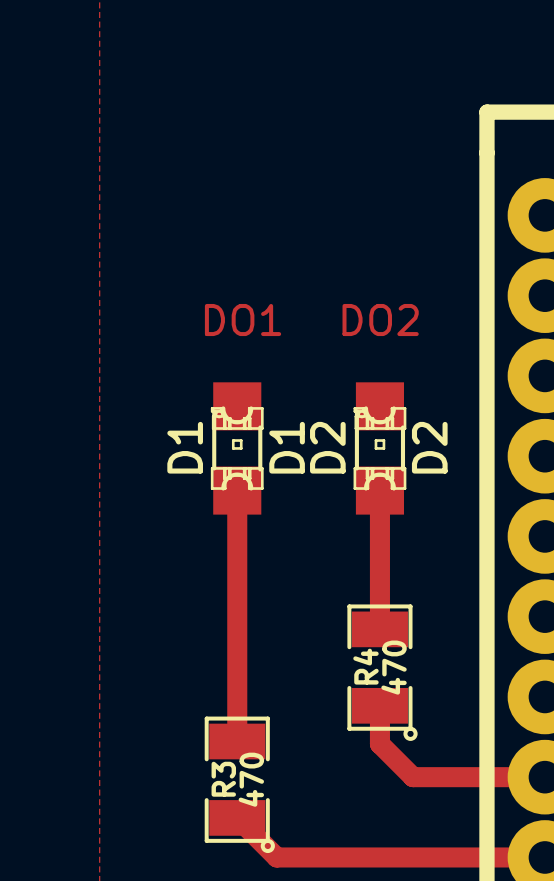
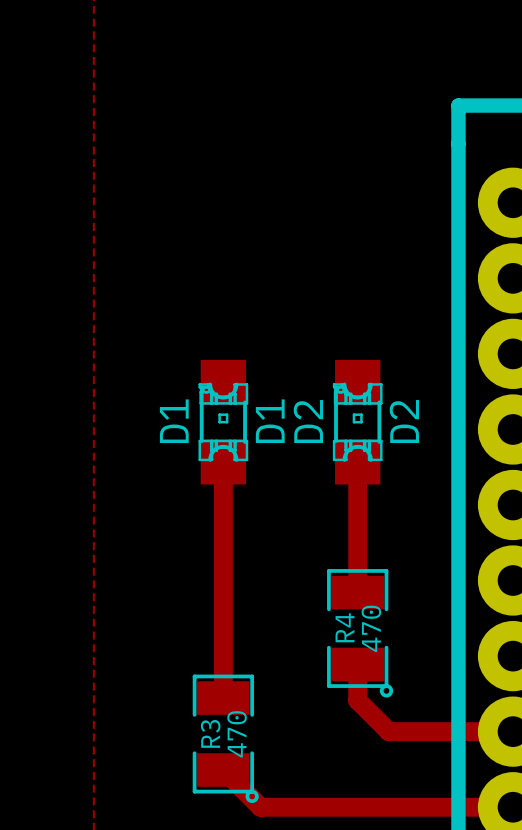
text: DO1 (243, 320) -> none
text: DO2 (380, 320) -> none

